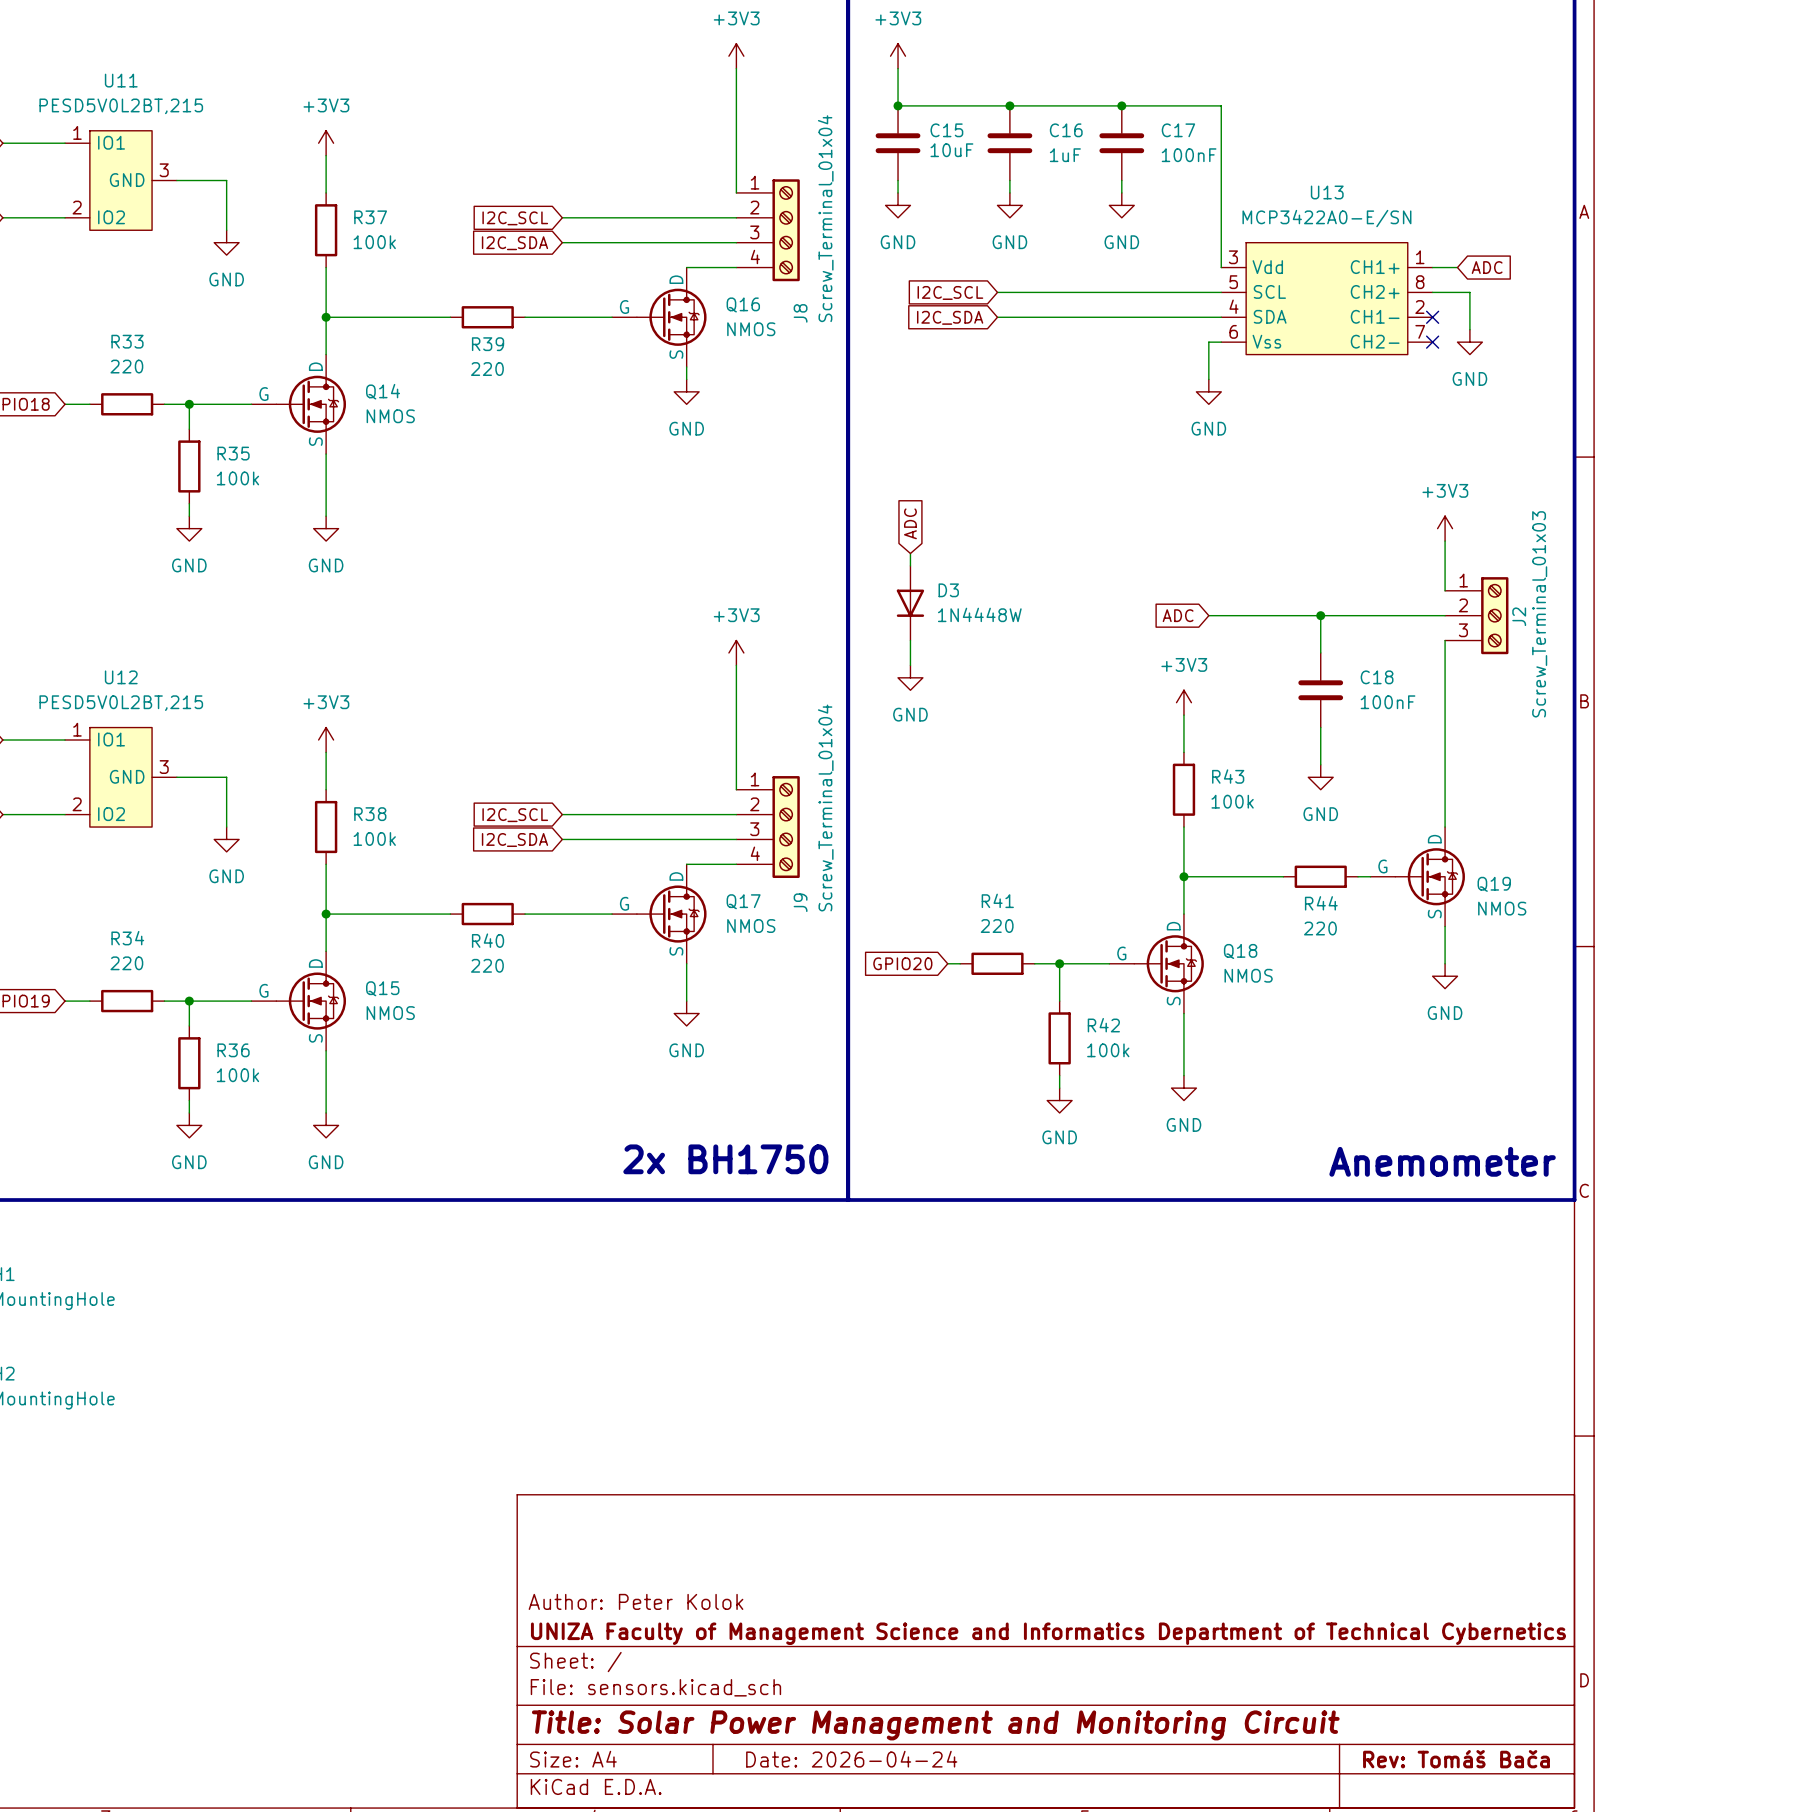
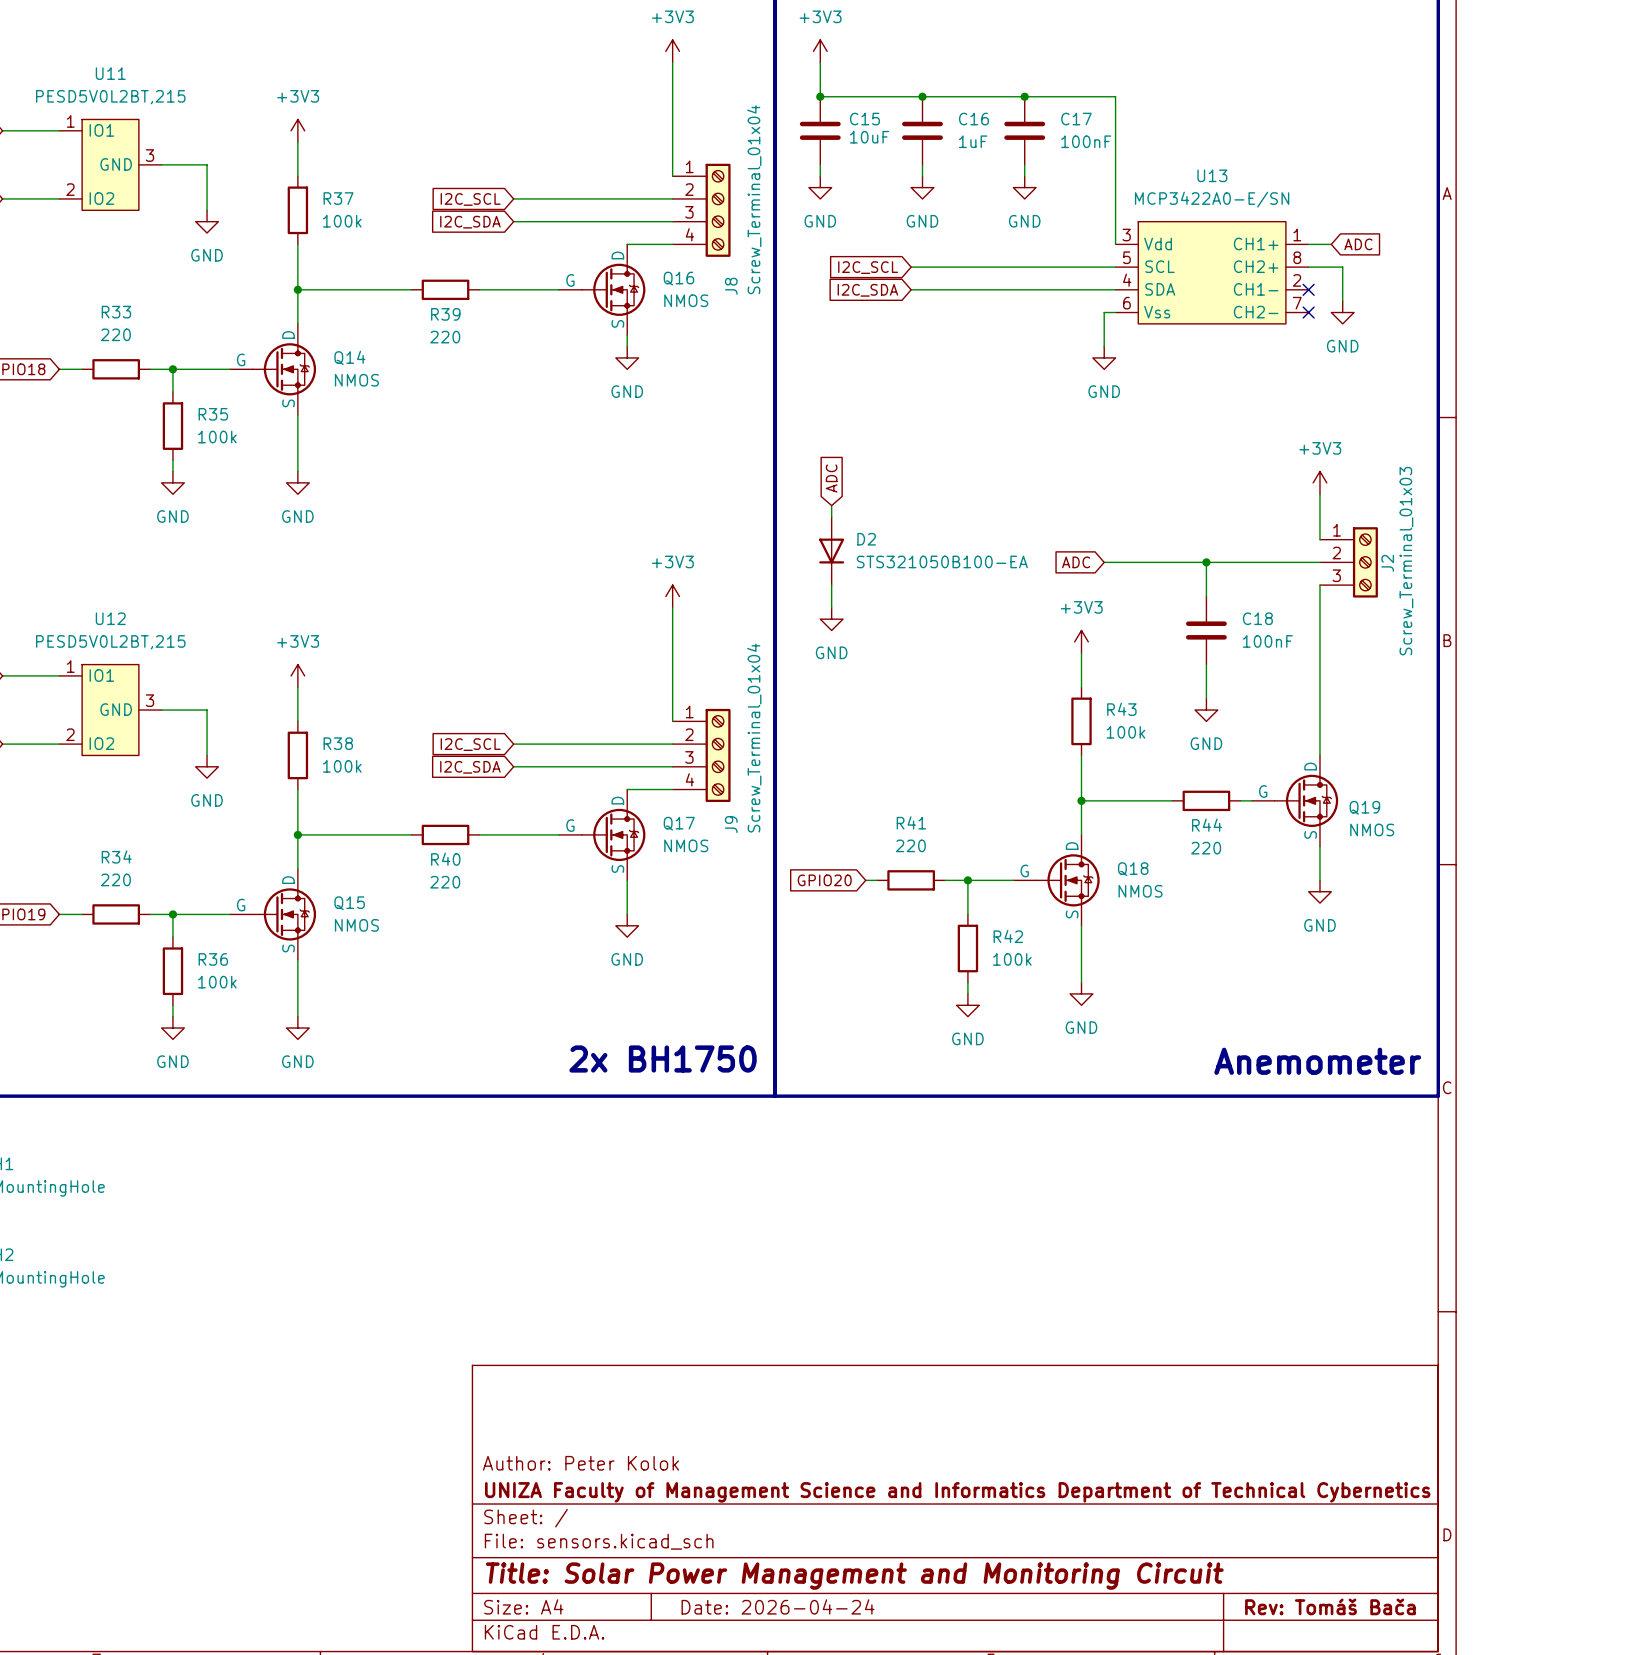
D3 name: D3 (948, 590) -> D2 (866, 539)
D3 value: 1N4448W (979, 614) -> STS321050B100-EA (942, 561)

